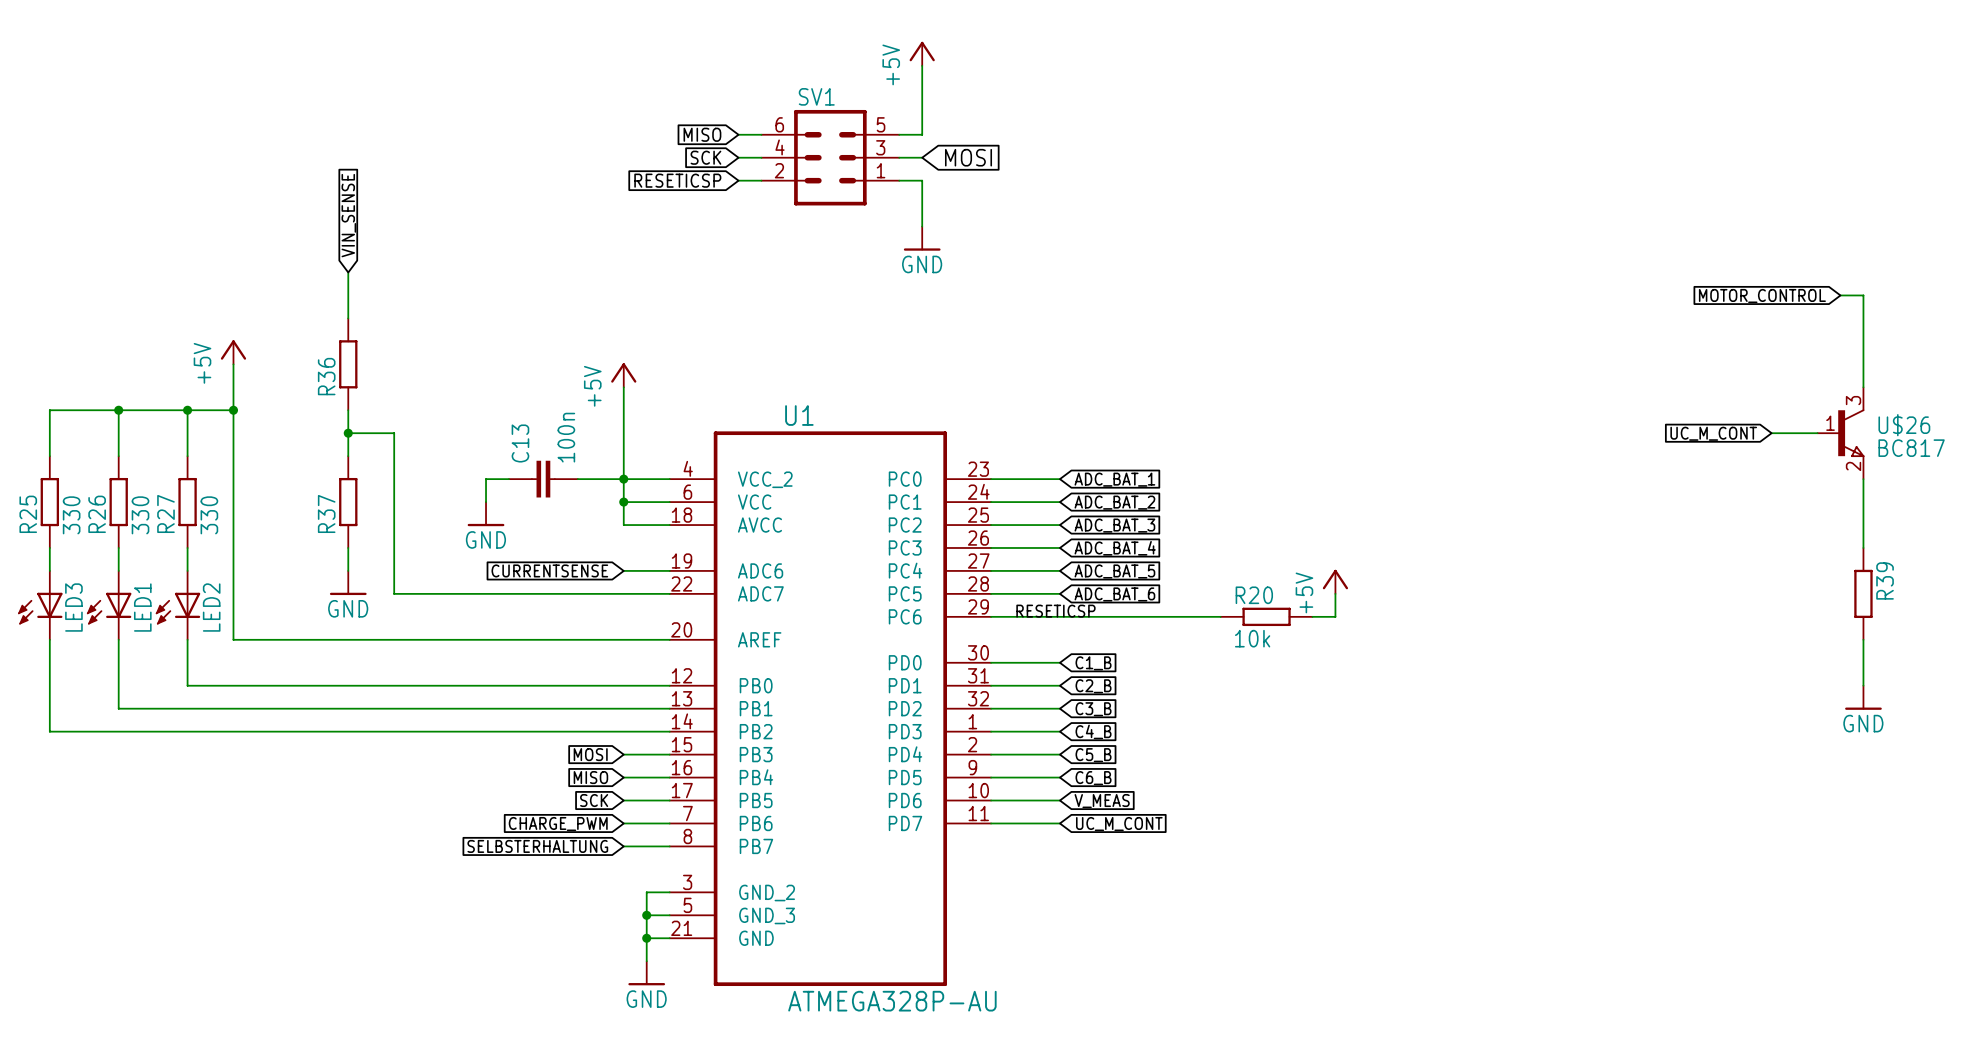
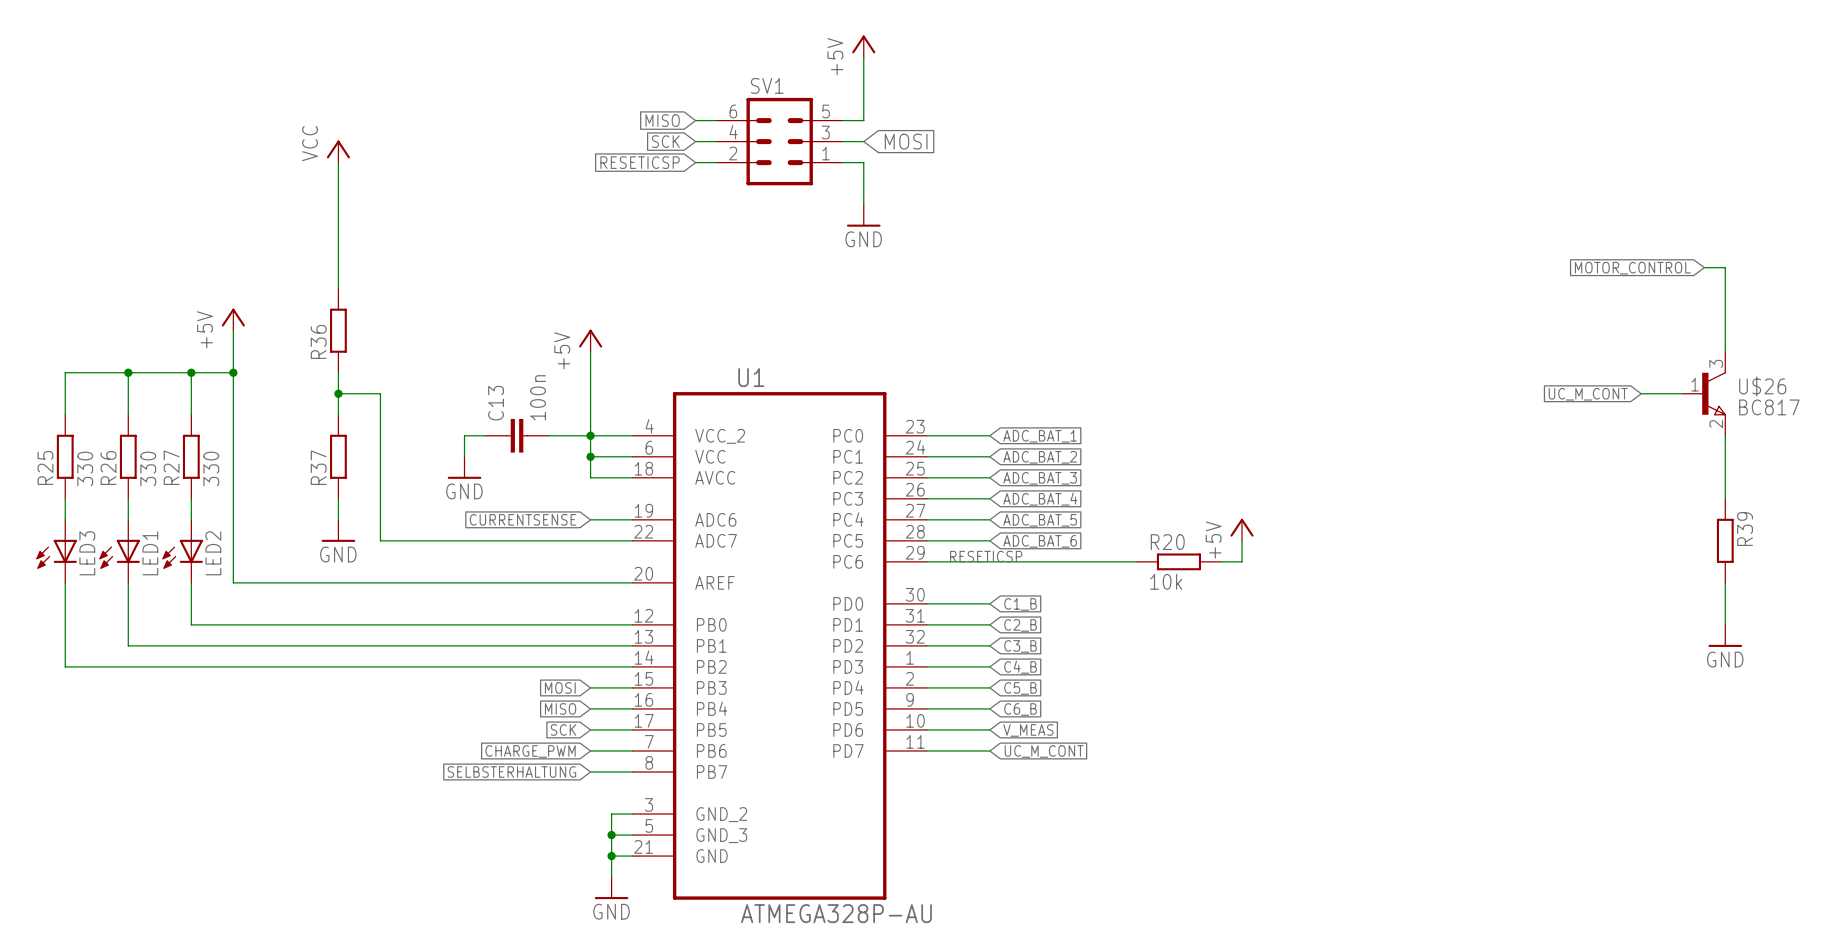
power symbol: none -> VCC (338, 151)
wire: none -> (338, 162) (338, 246)
global label: VIN_SENSE (348, 215) -> none

